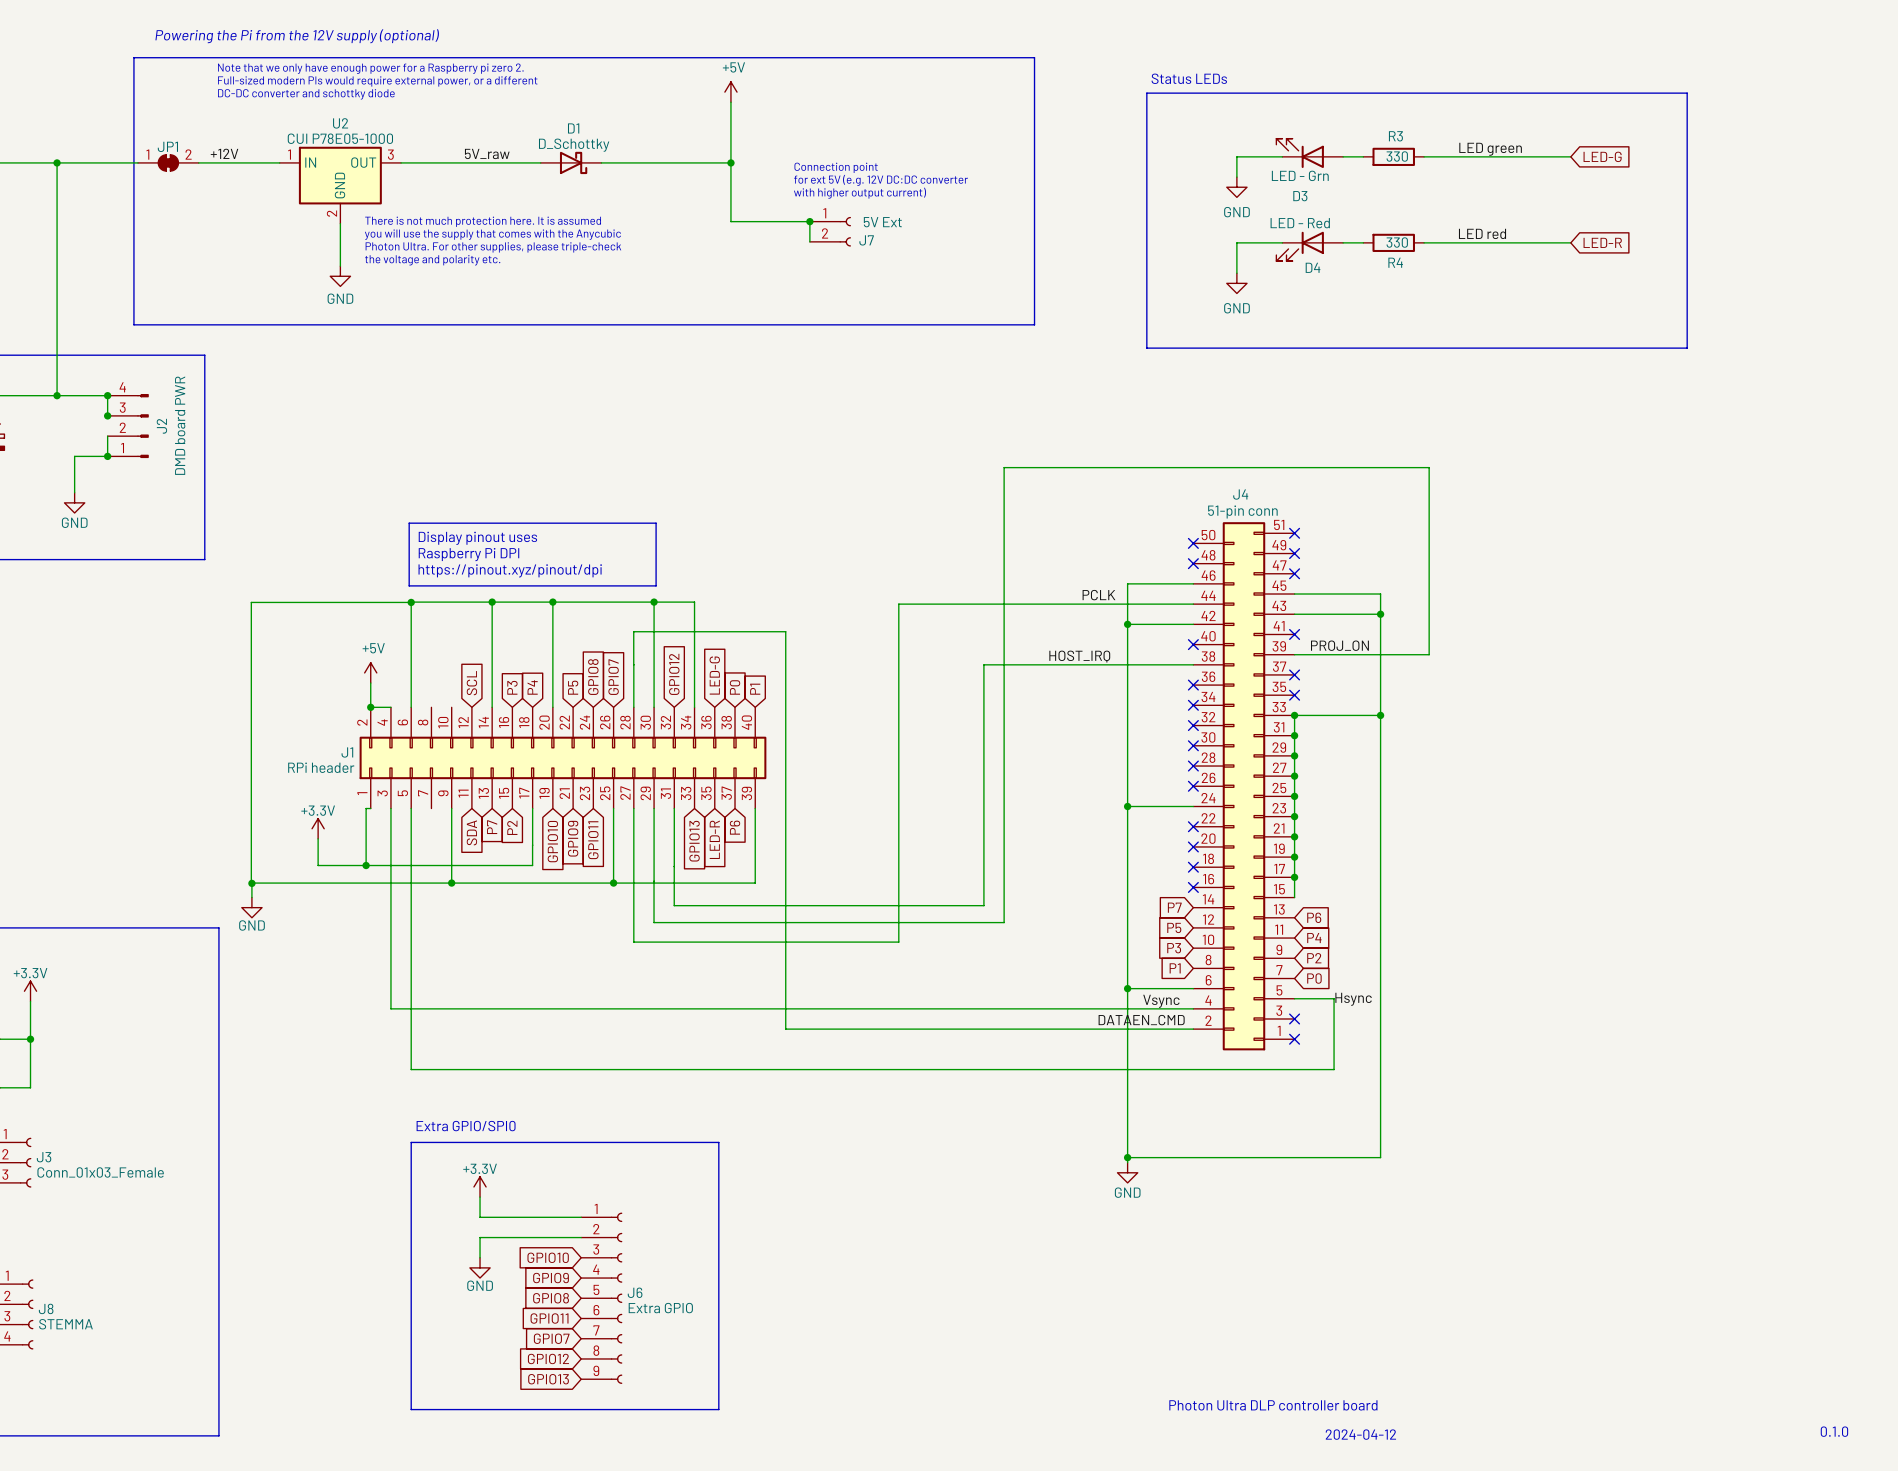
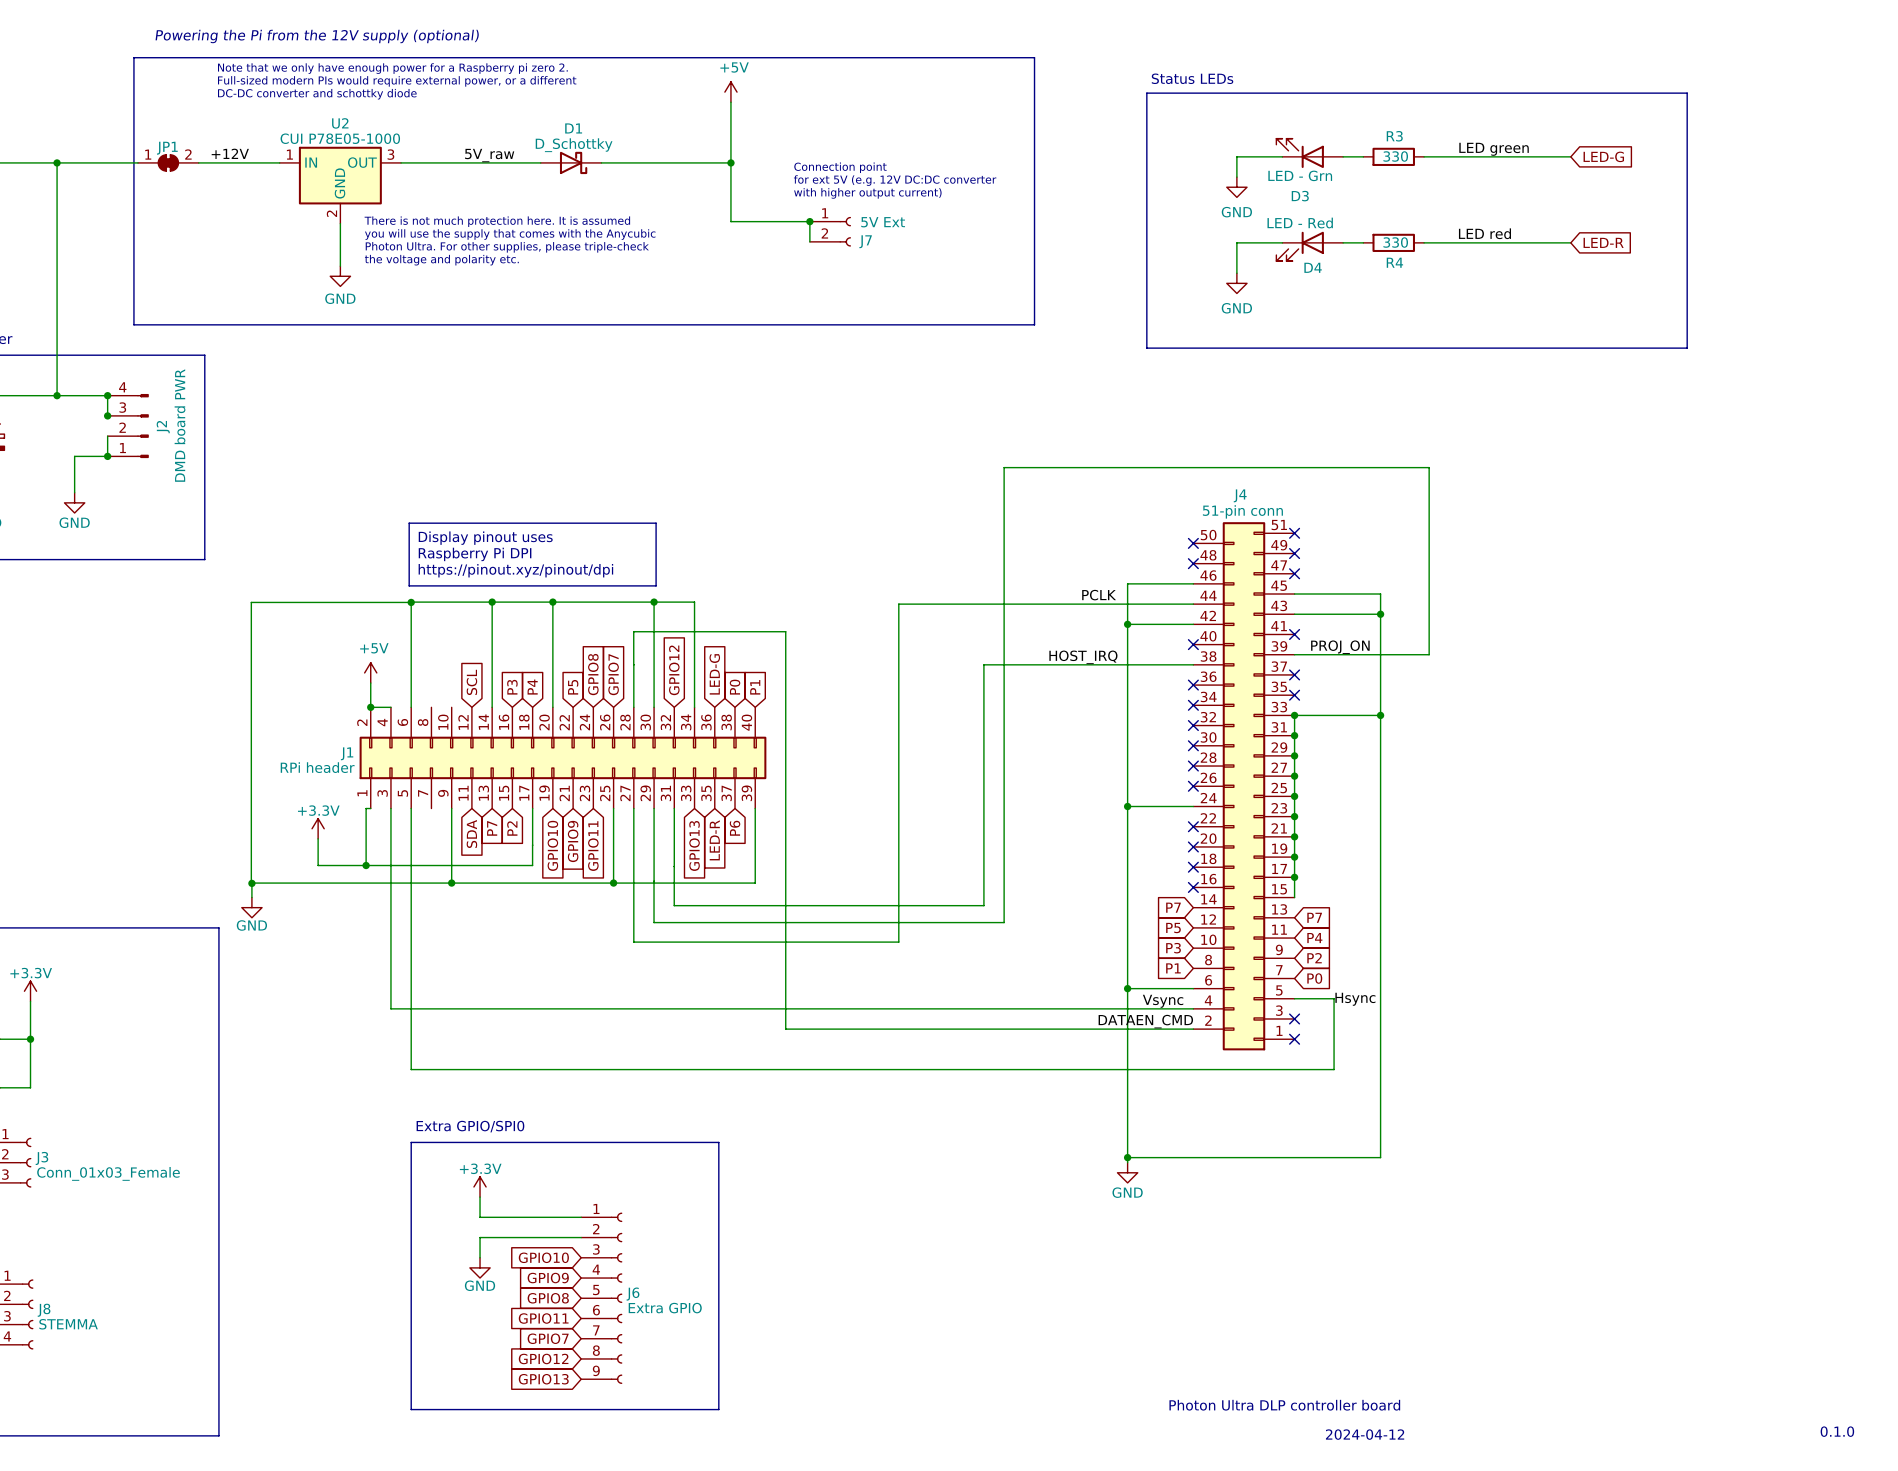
global label: P6 (1314, 917) -> P7 (1314, 917)

